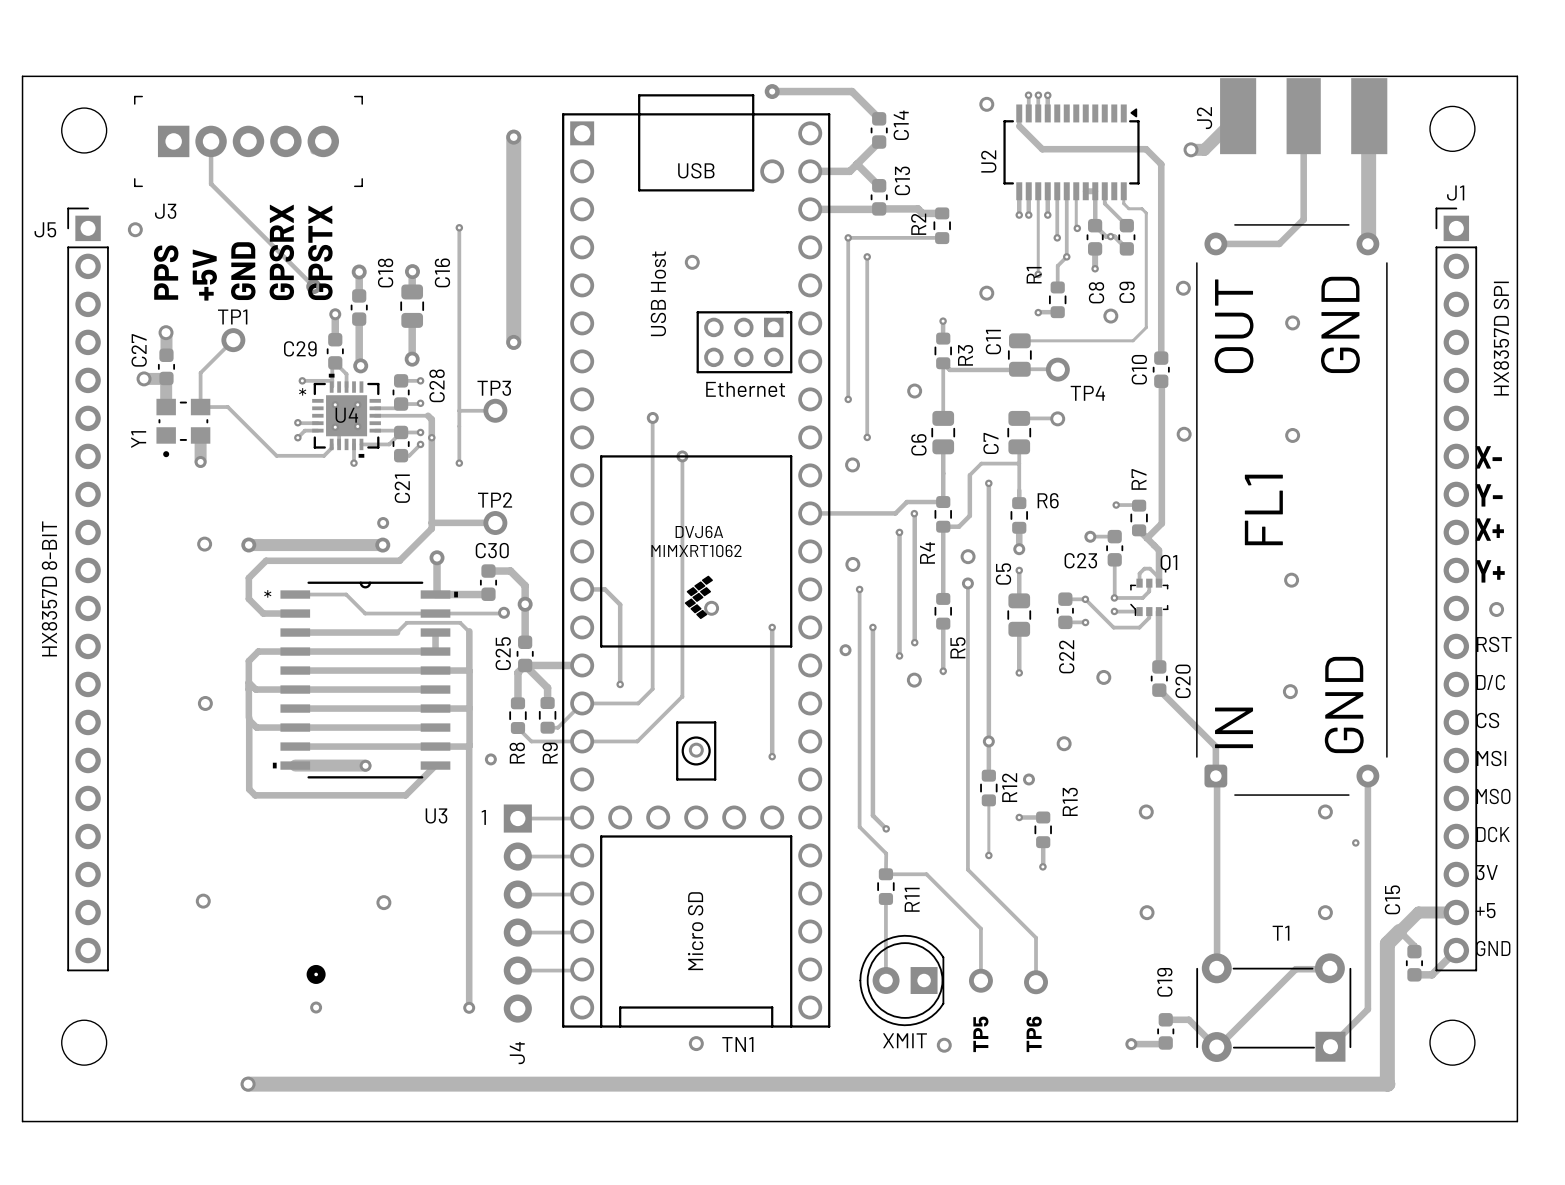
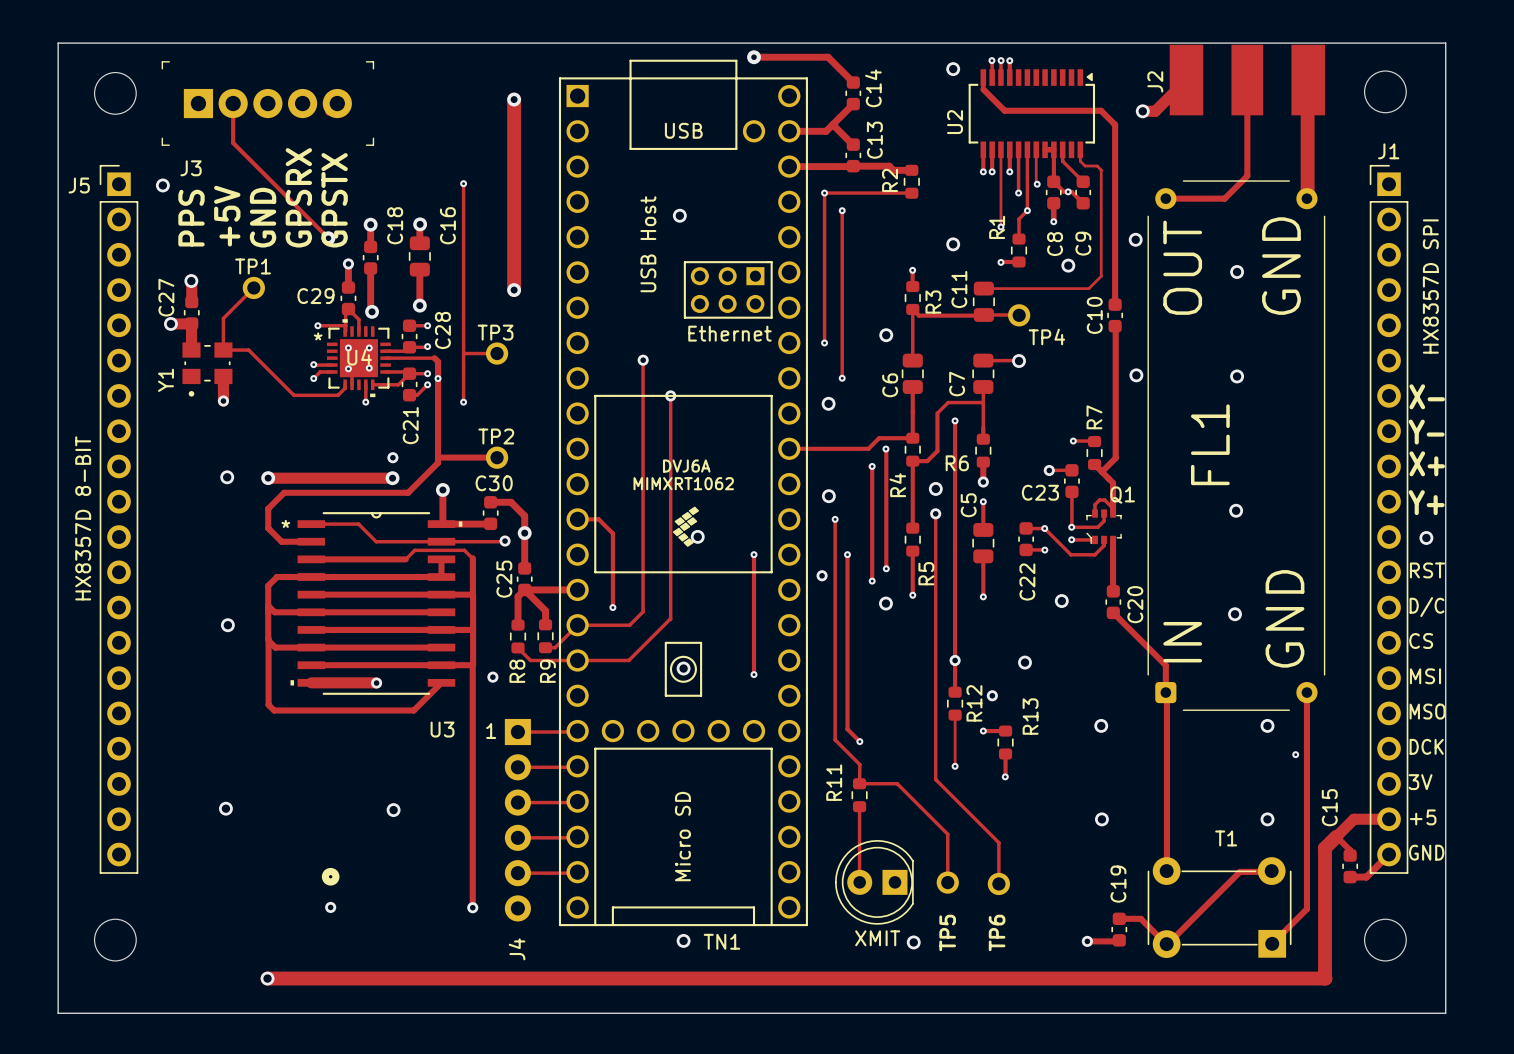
R6 name position: R6 (1048, 500) -> R6 (957, 463)
R11 name position: R11 (912, 899) -> R11 (834, 782)

